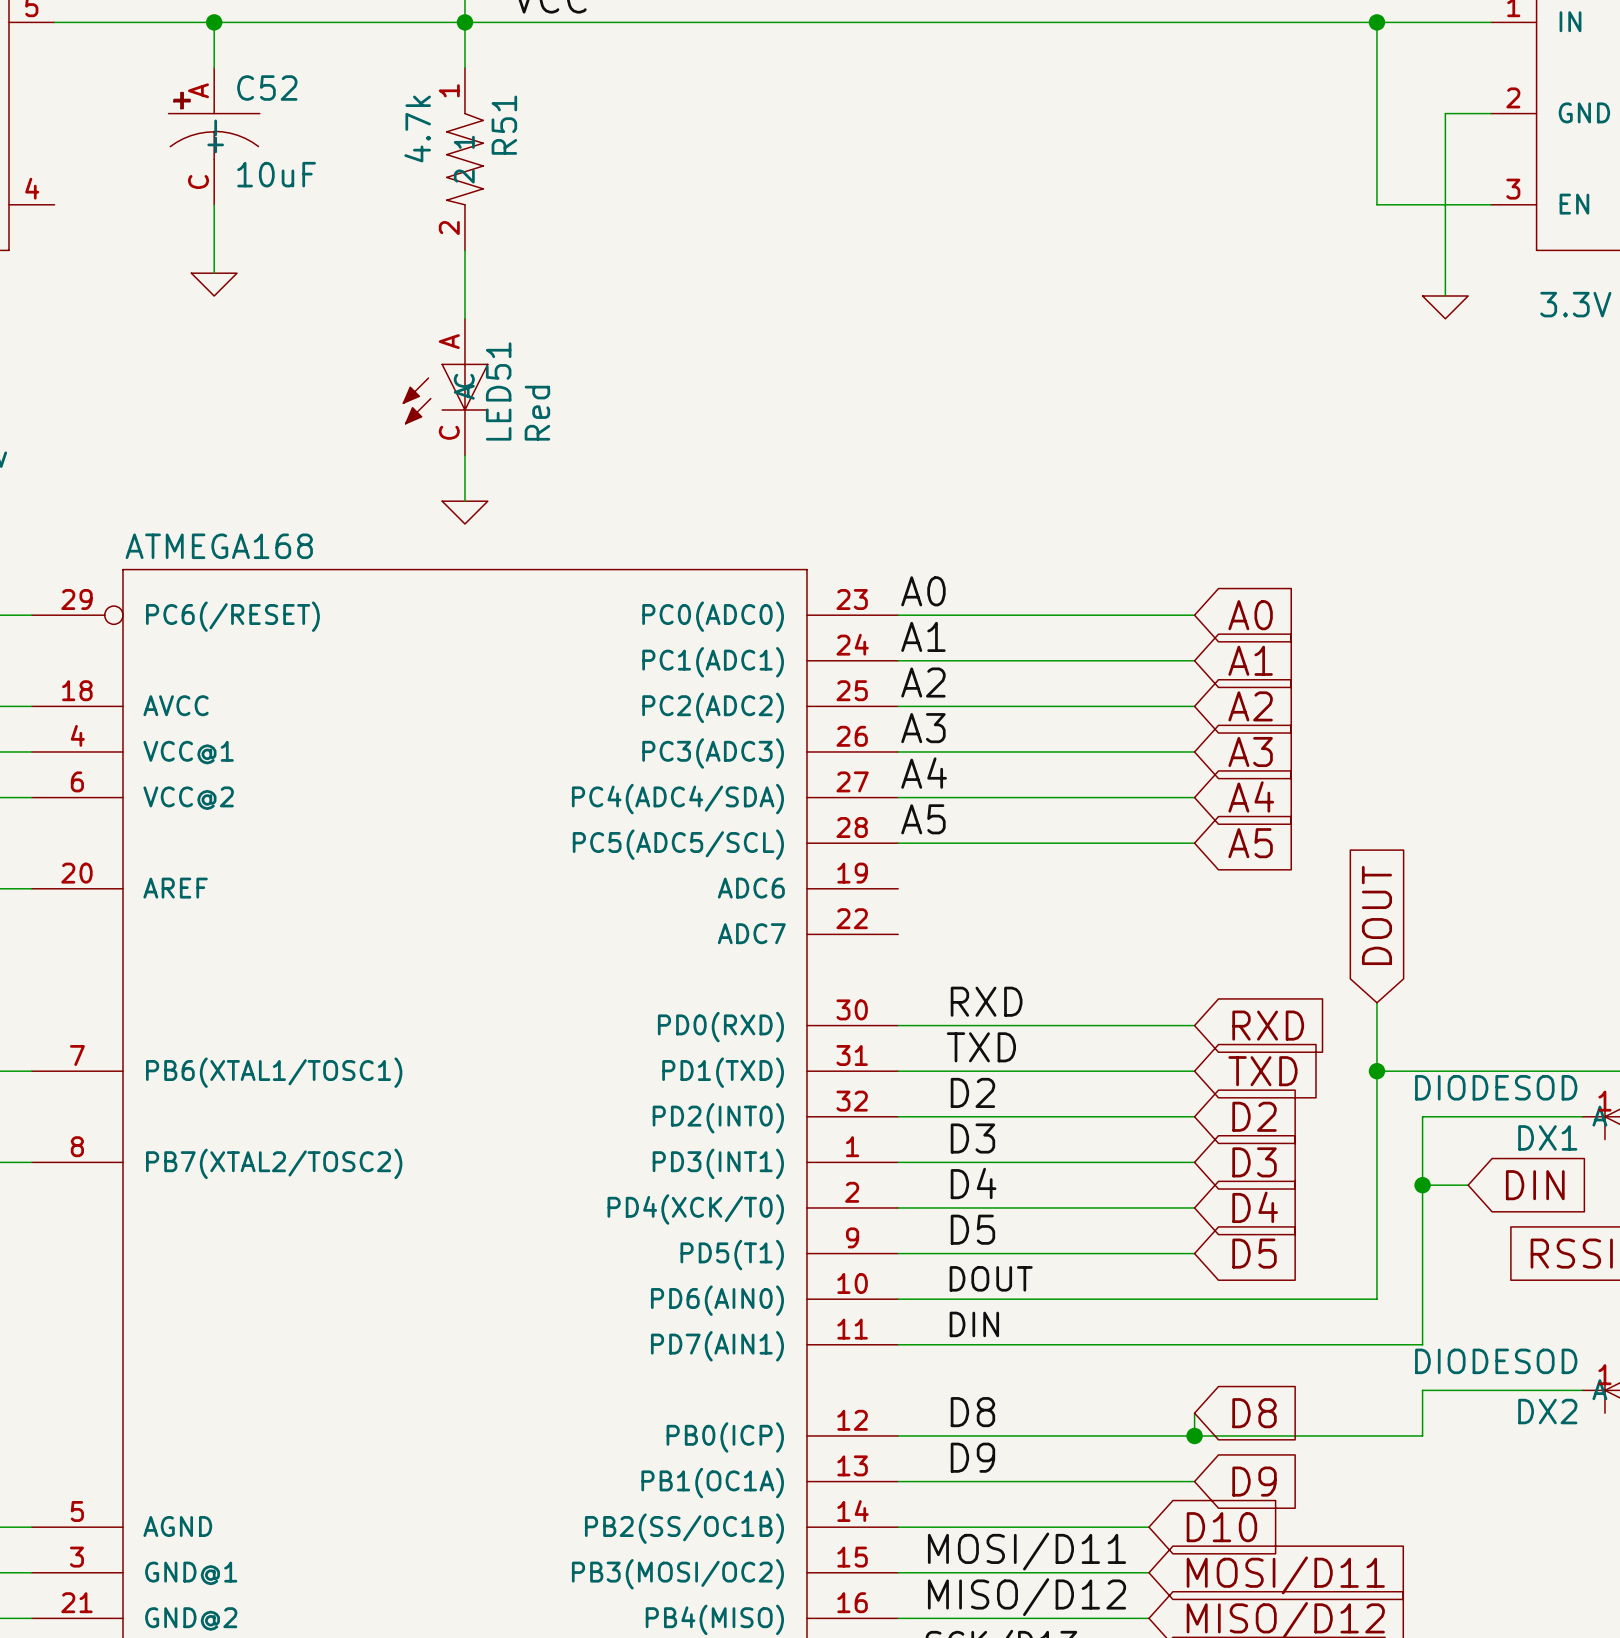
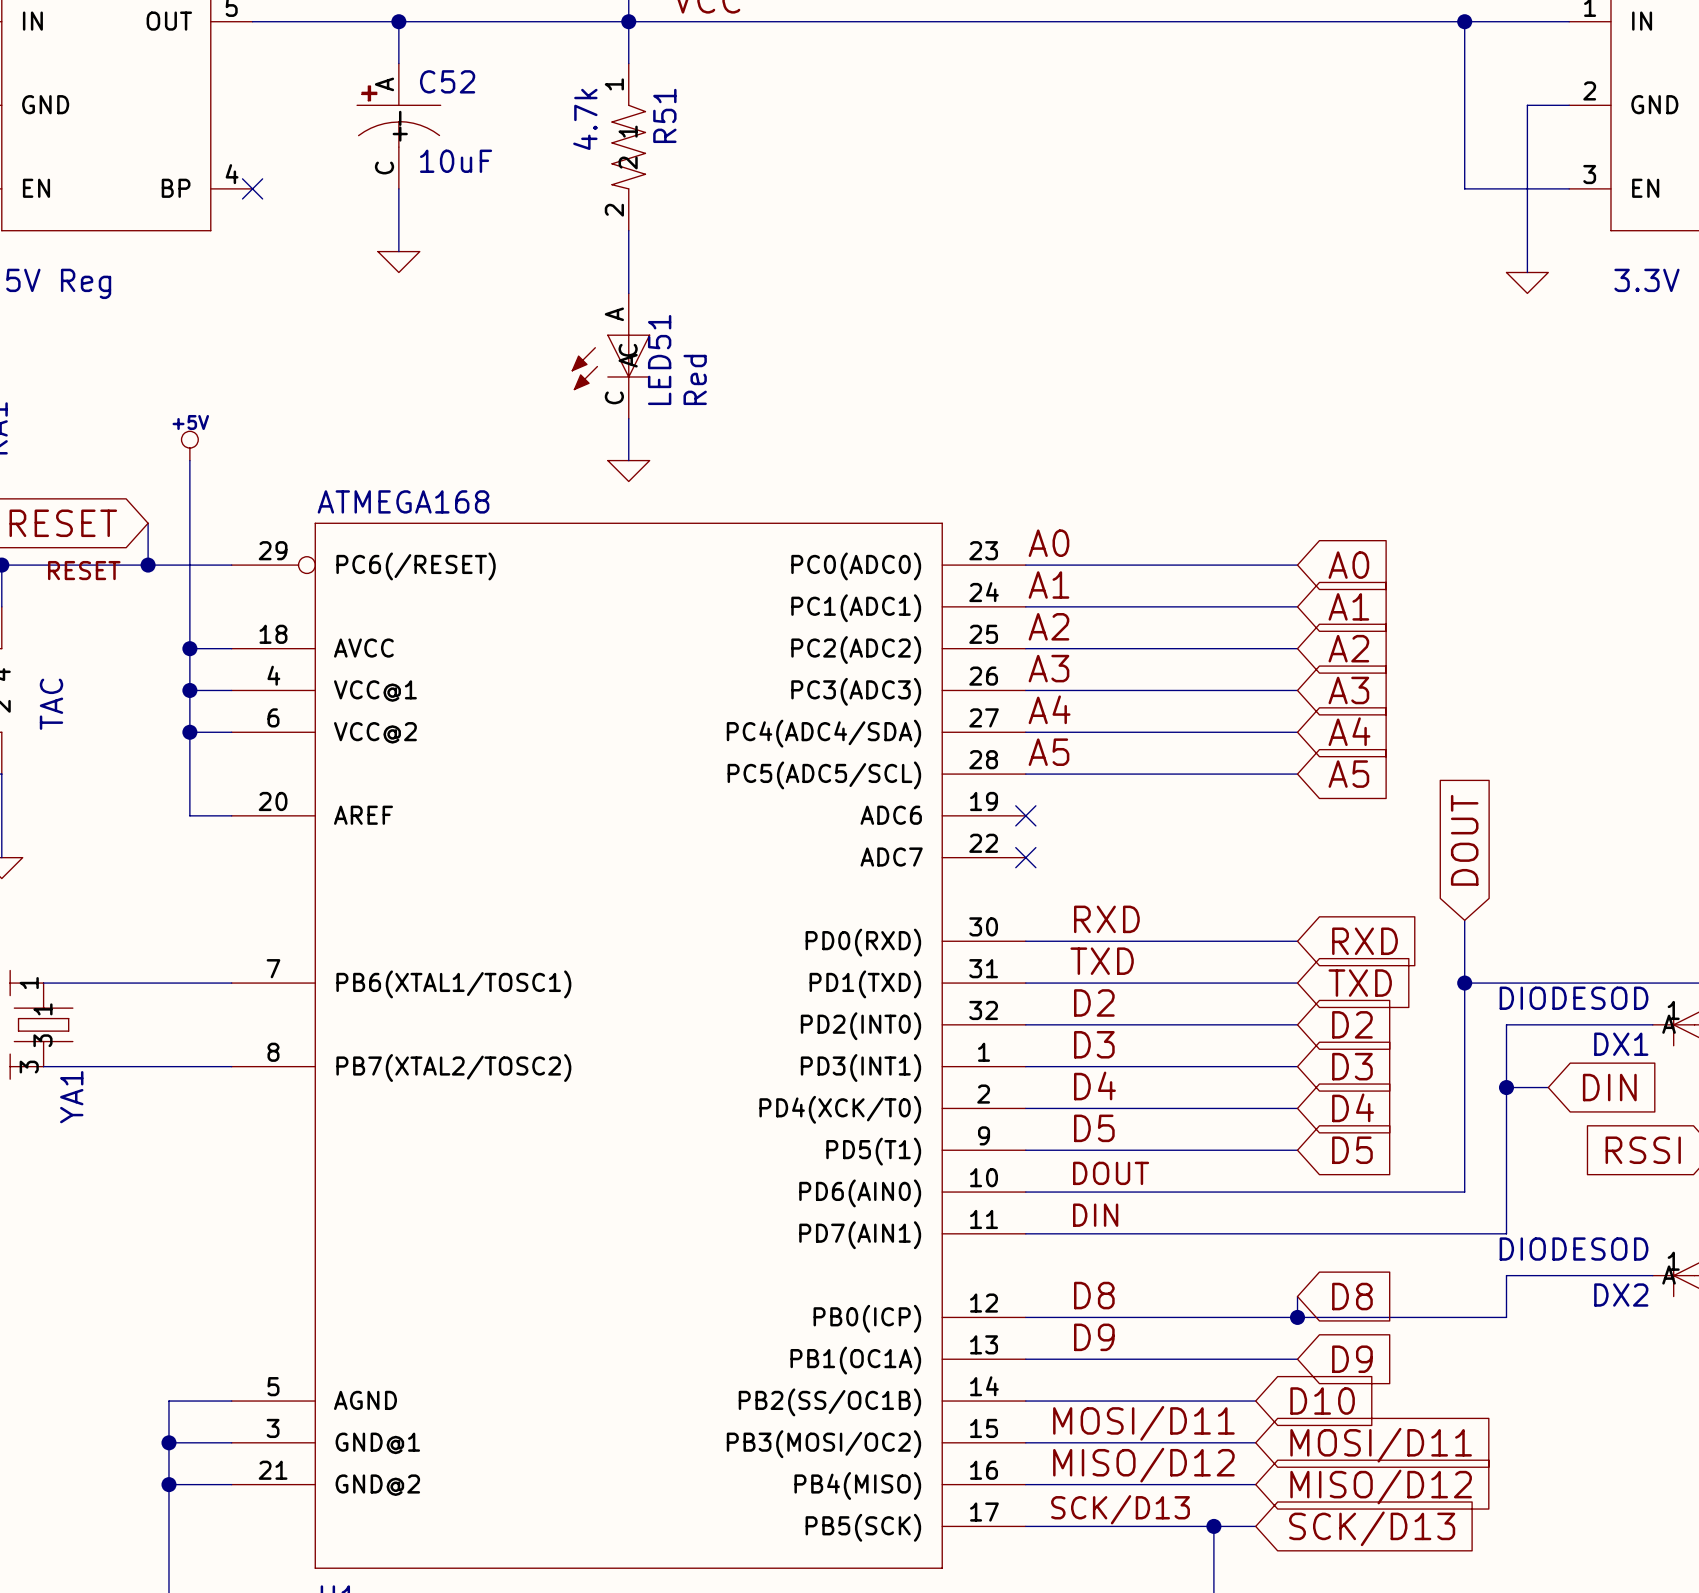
no-connect mark: none -> (252, 188)
no-connect mark: none -> (1025, 815)
no-connect mark: none -> (1025, 857)

